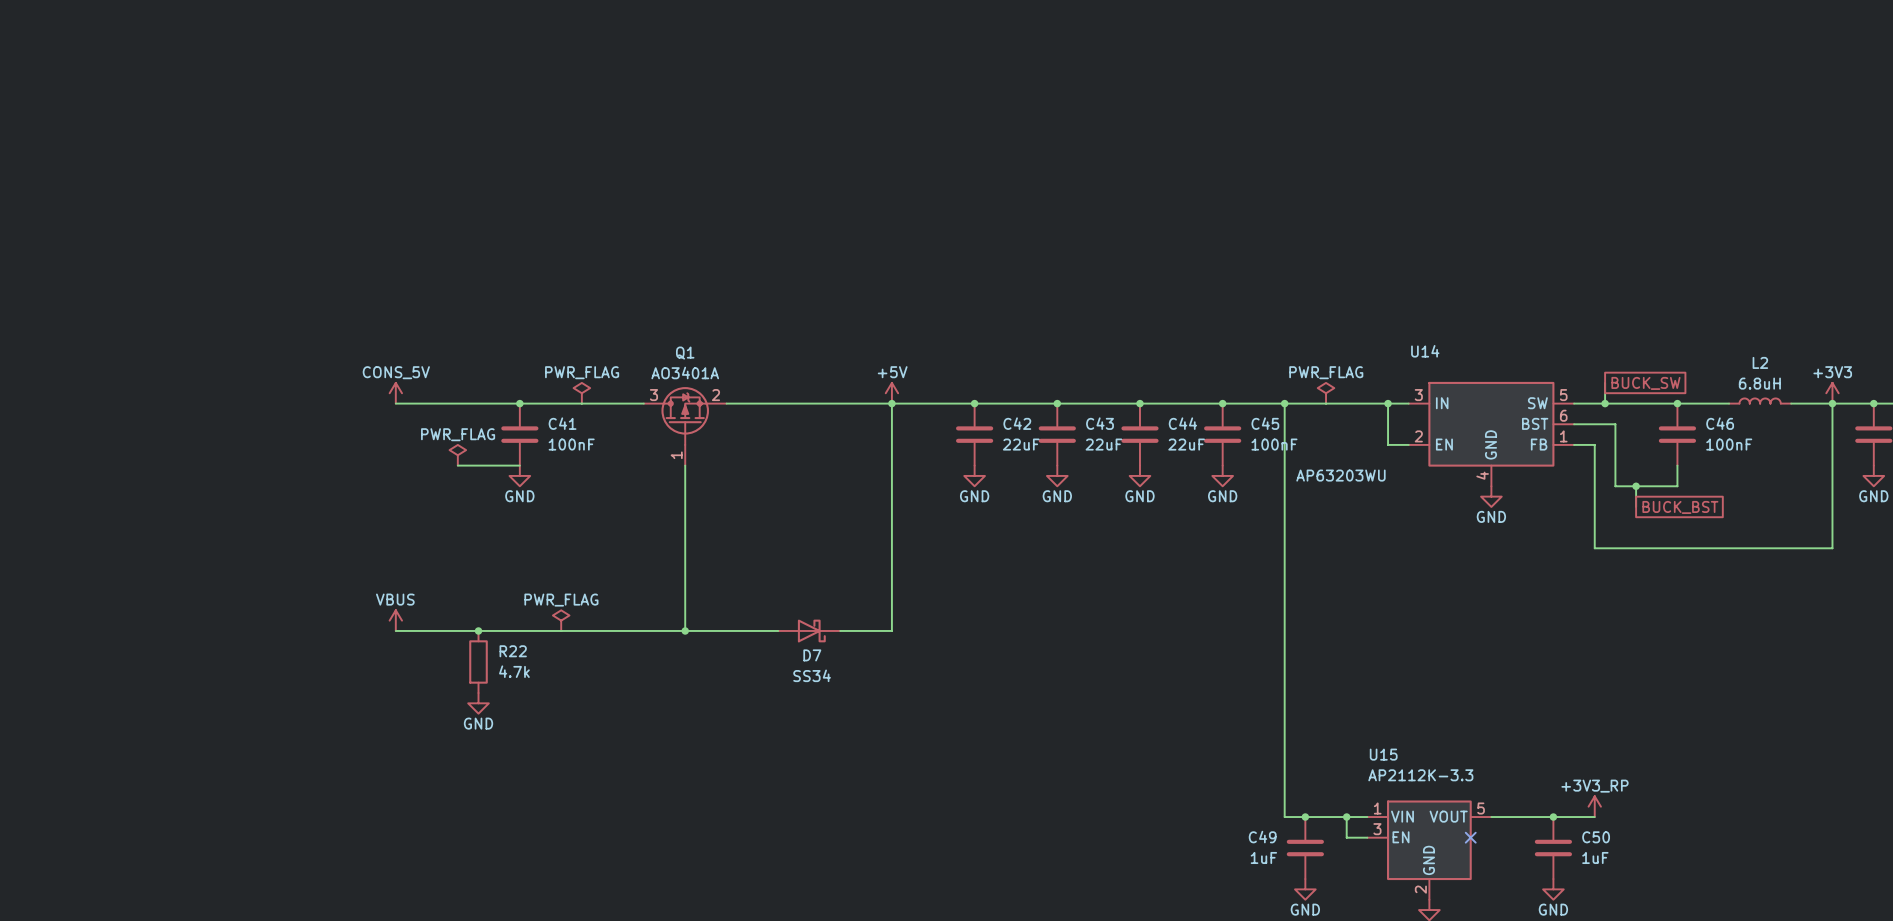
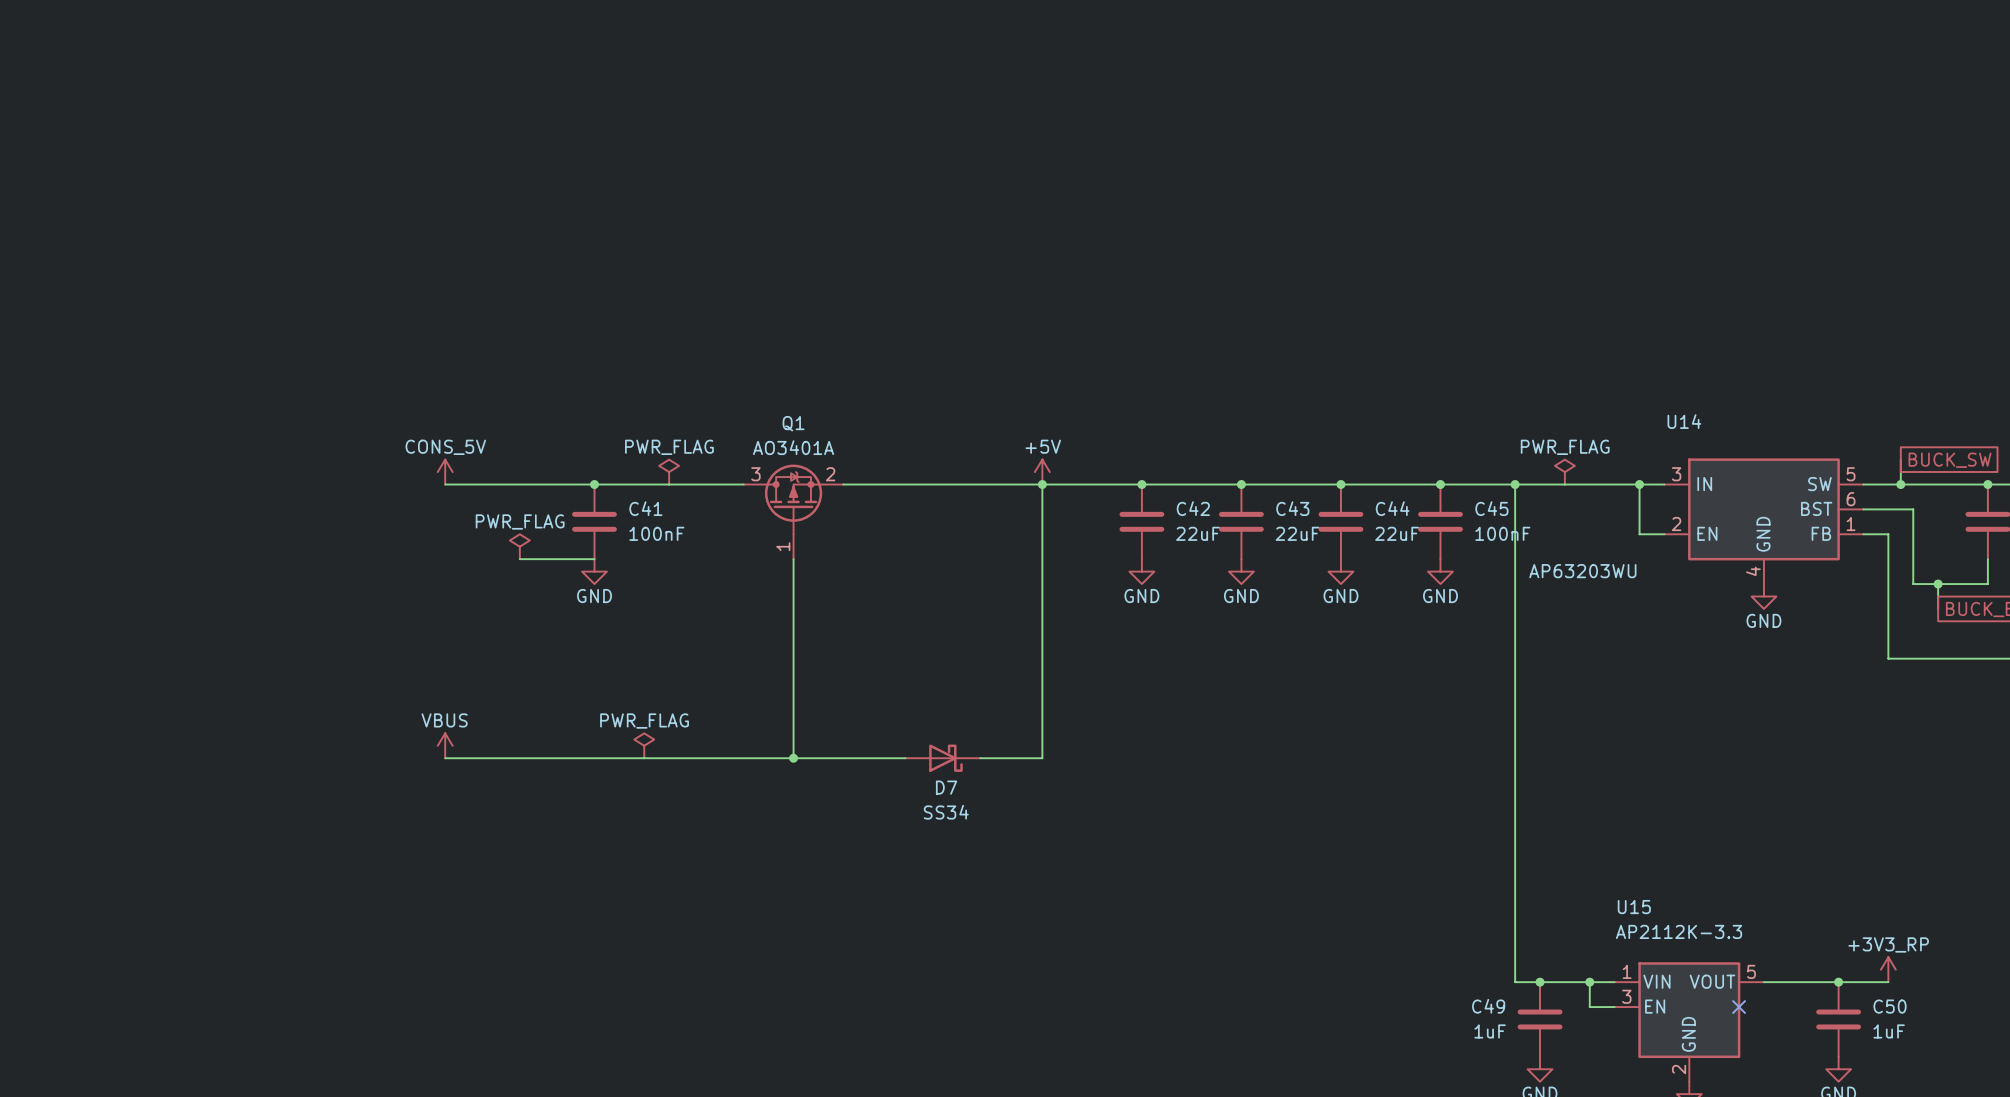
junction: (478, 630) -> none
R22: 4.7k (478, 661) -> none
power symbol: GND (478, 703) -> none

